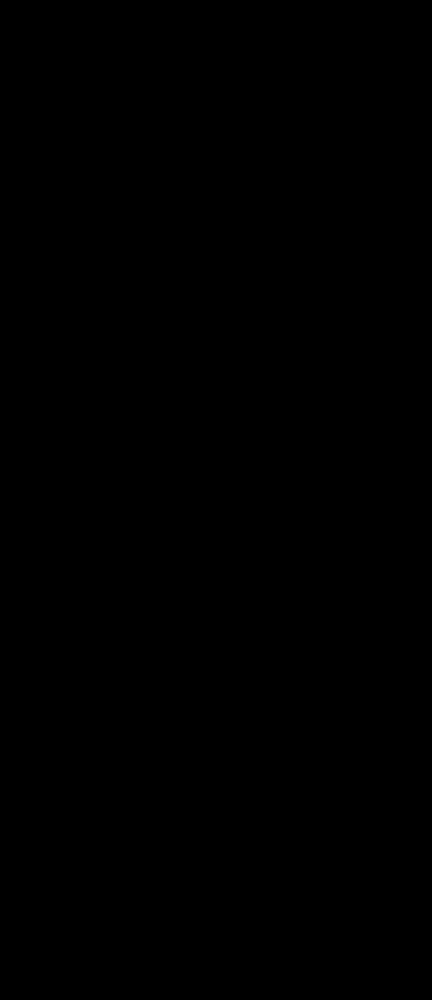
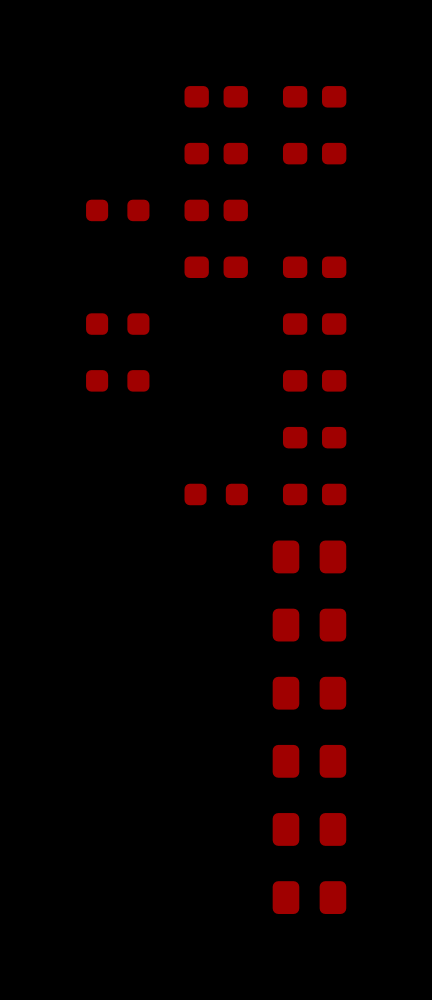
part: none -> (216, 96)
part: none -> (314, 96)
part: none -> (216, 153)
part: none -> (314, 153)
part: none -> (117, 210)
part: none -> (216, 210)
part: none -> (216, 267)
part: none -> (314, 267)
part: none -> (117, 324)
part: none -> (314, 324)
part: none -> (117, 380)
part: none -> (314, 380)
part: none -> (314, 437)
part: none -> (216, 494)
part: none -> (314, 494)
part: none -> (309, 556)
part: none -> (309, 625)
part: none -> (309, 693)
part: none -> (309, 761)
part: none -> (309, 829)
part: none -> (309, 897)

